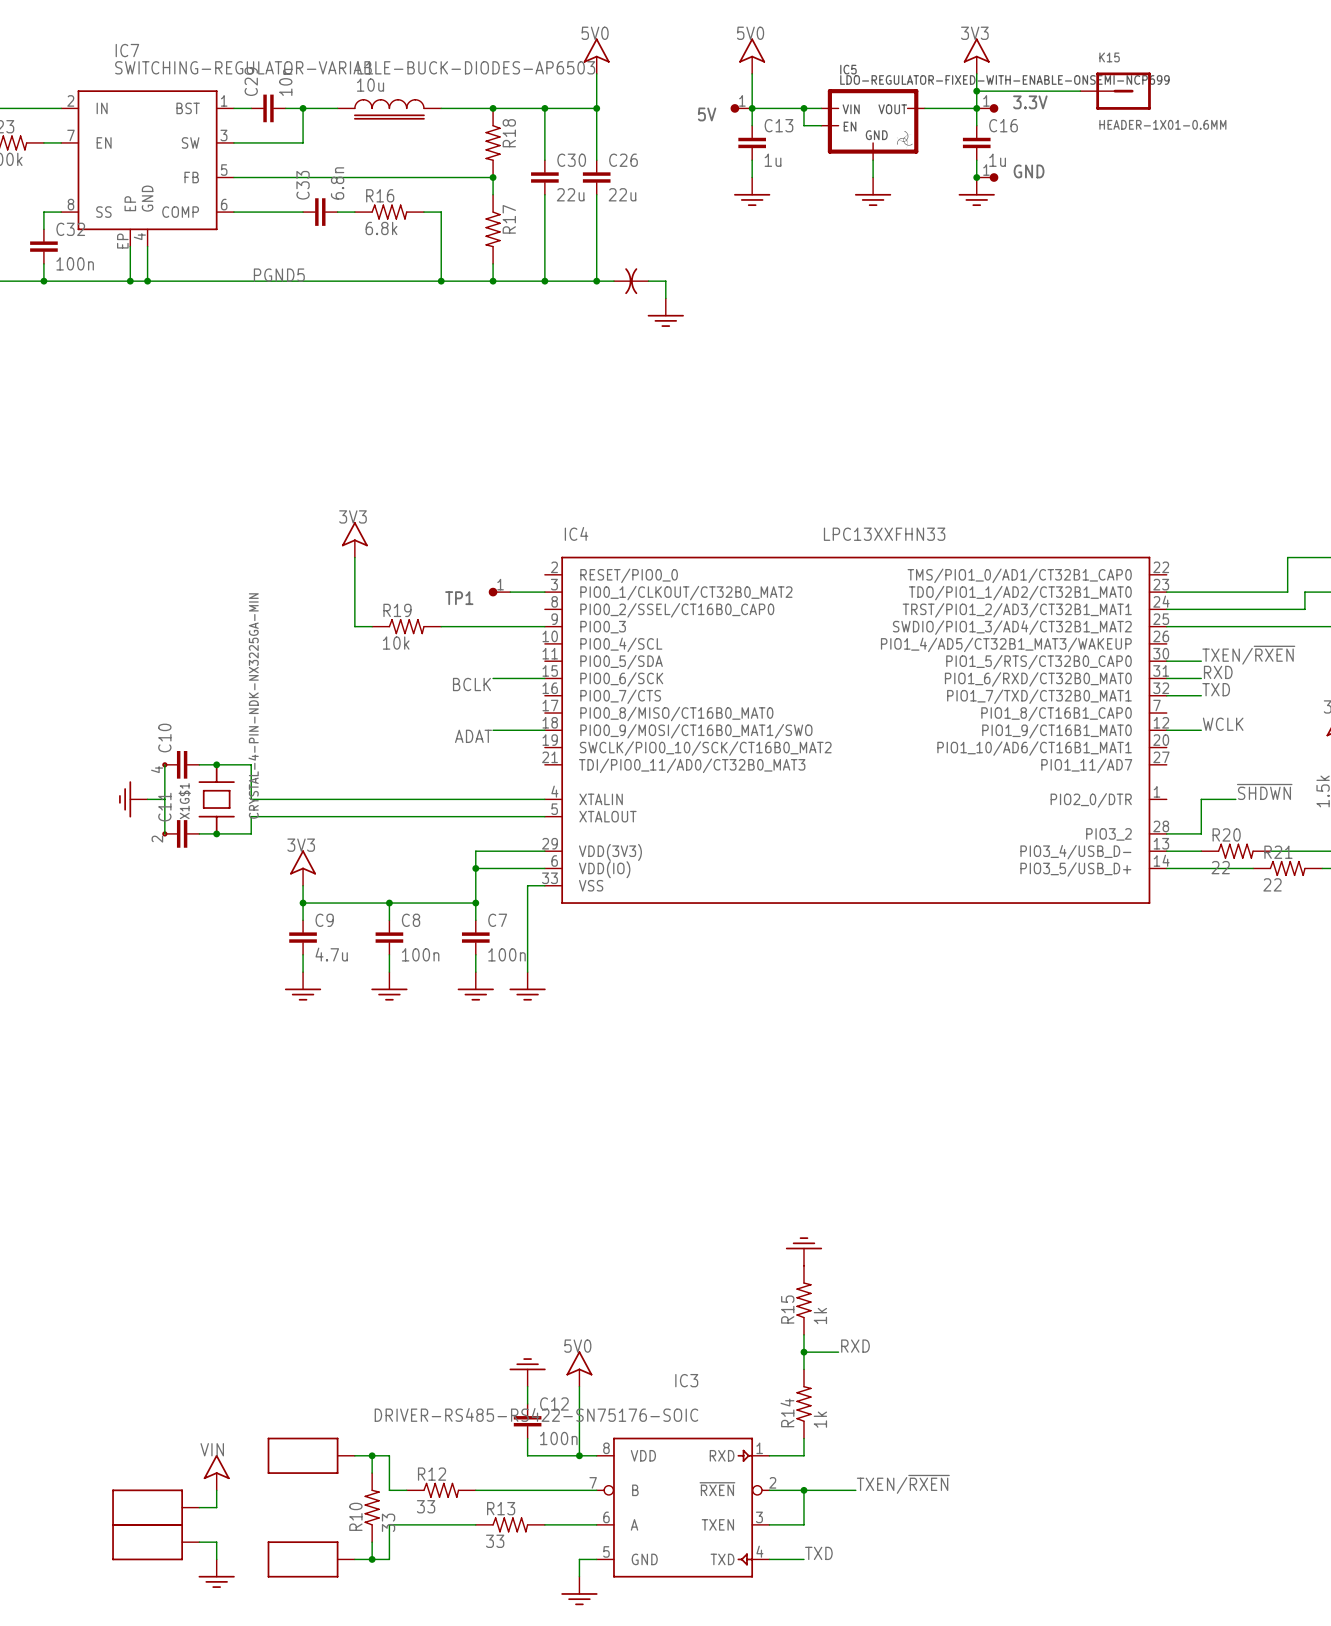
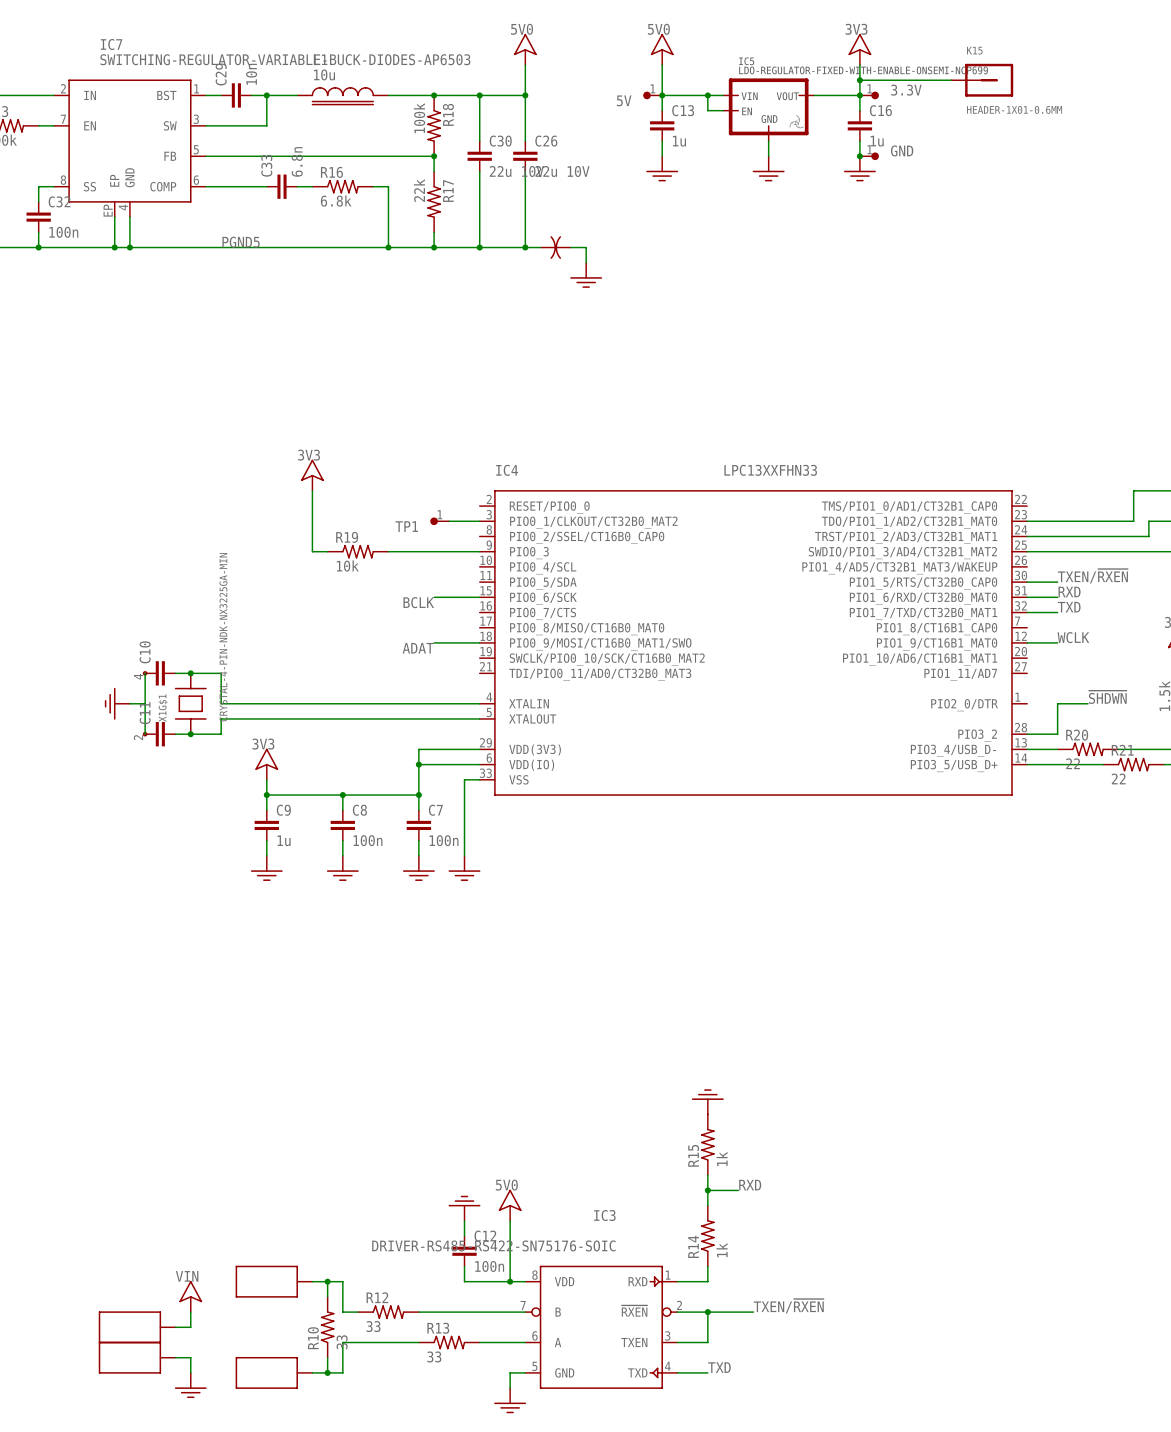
R18 value: none -> 100k (419, 118)
C30 value: 22u (570, 194) -> 22u 10V (516, 171)
C26 value: 22u (622, 194) -> 22u 10V (562, 171)
R17 value: none -> 22k (419, 190)
C9 value: 4.7u (331, 954) -> 1u (284, 840)

